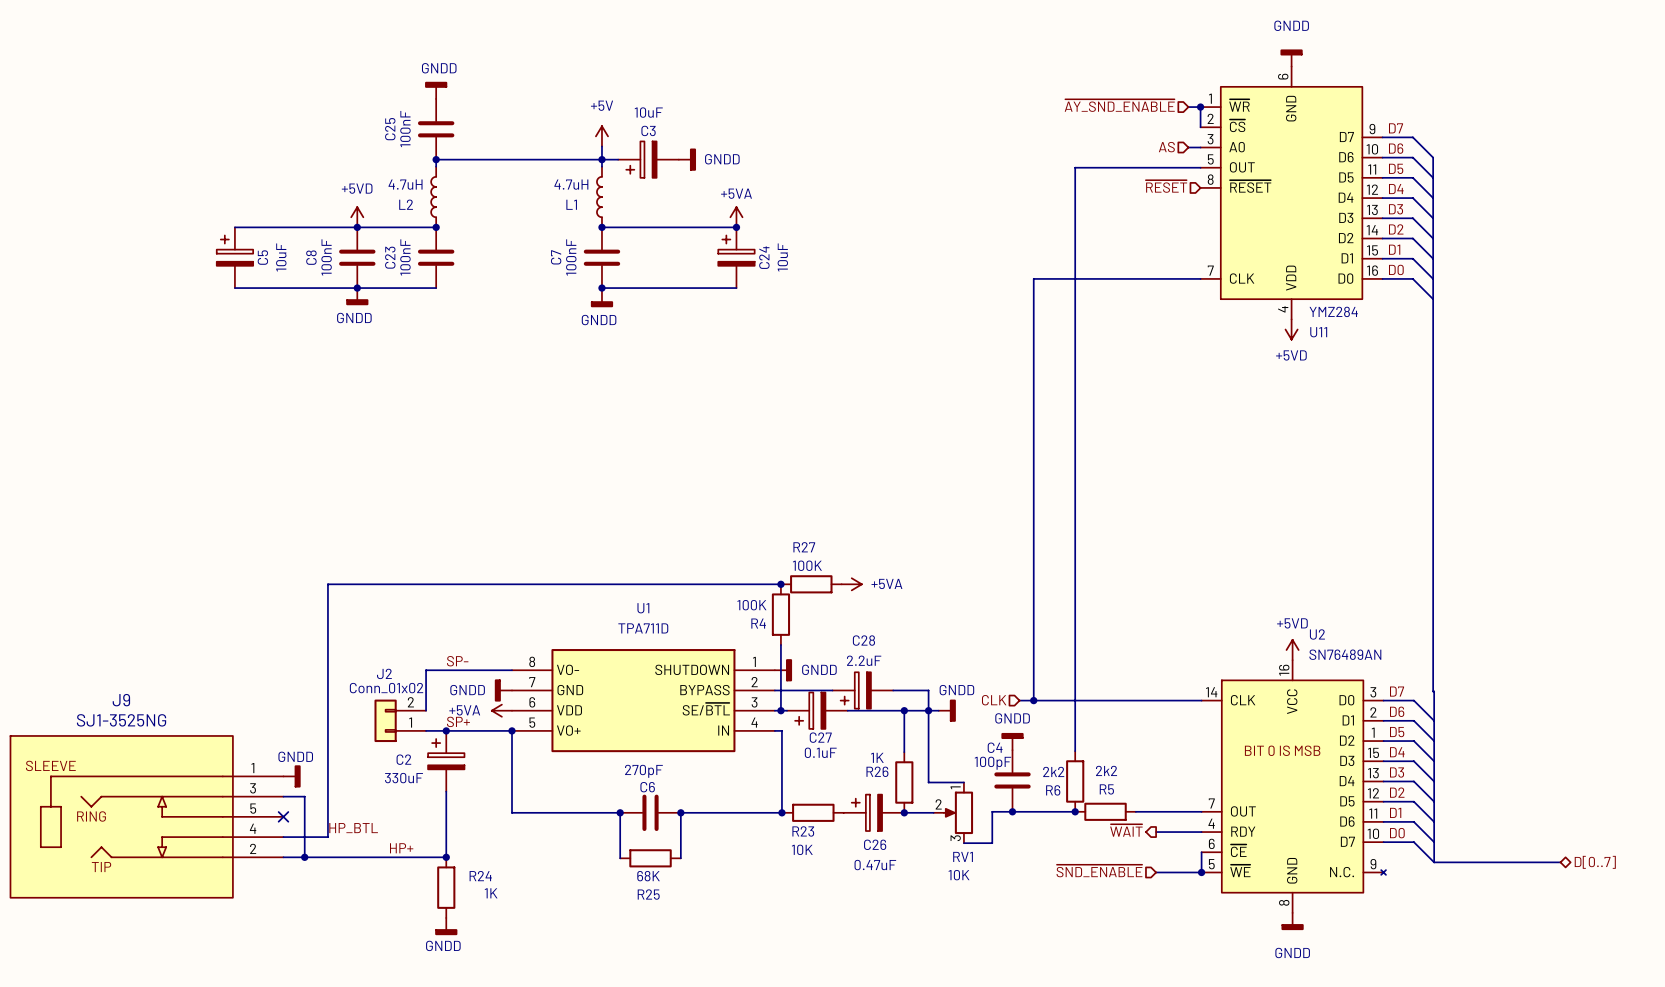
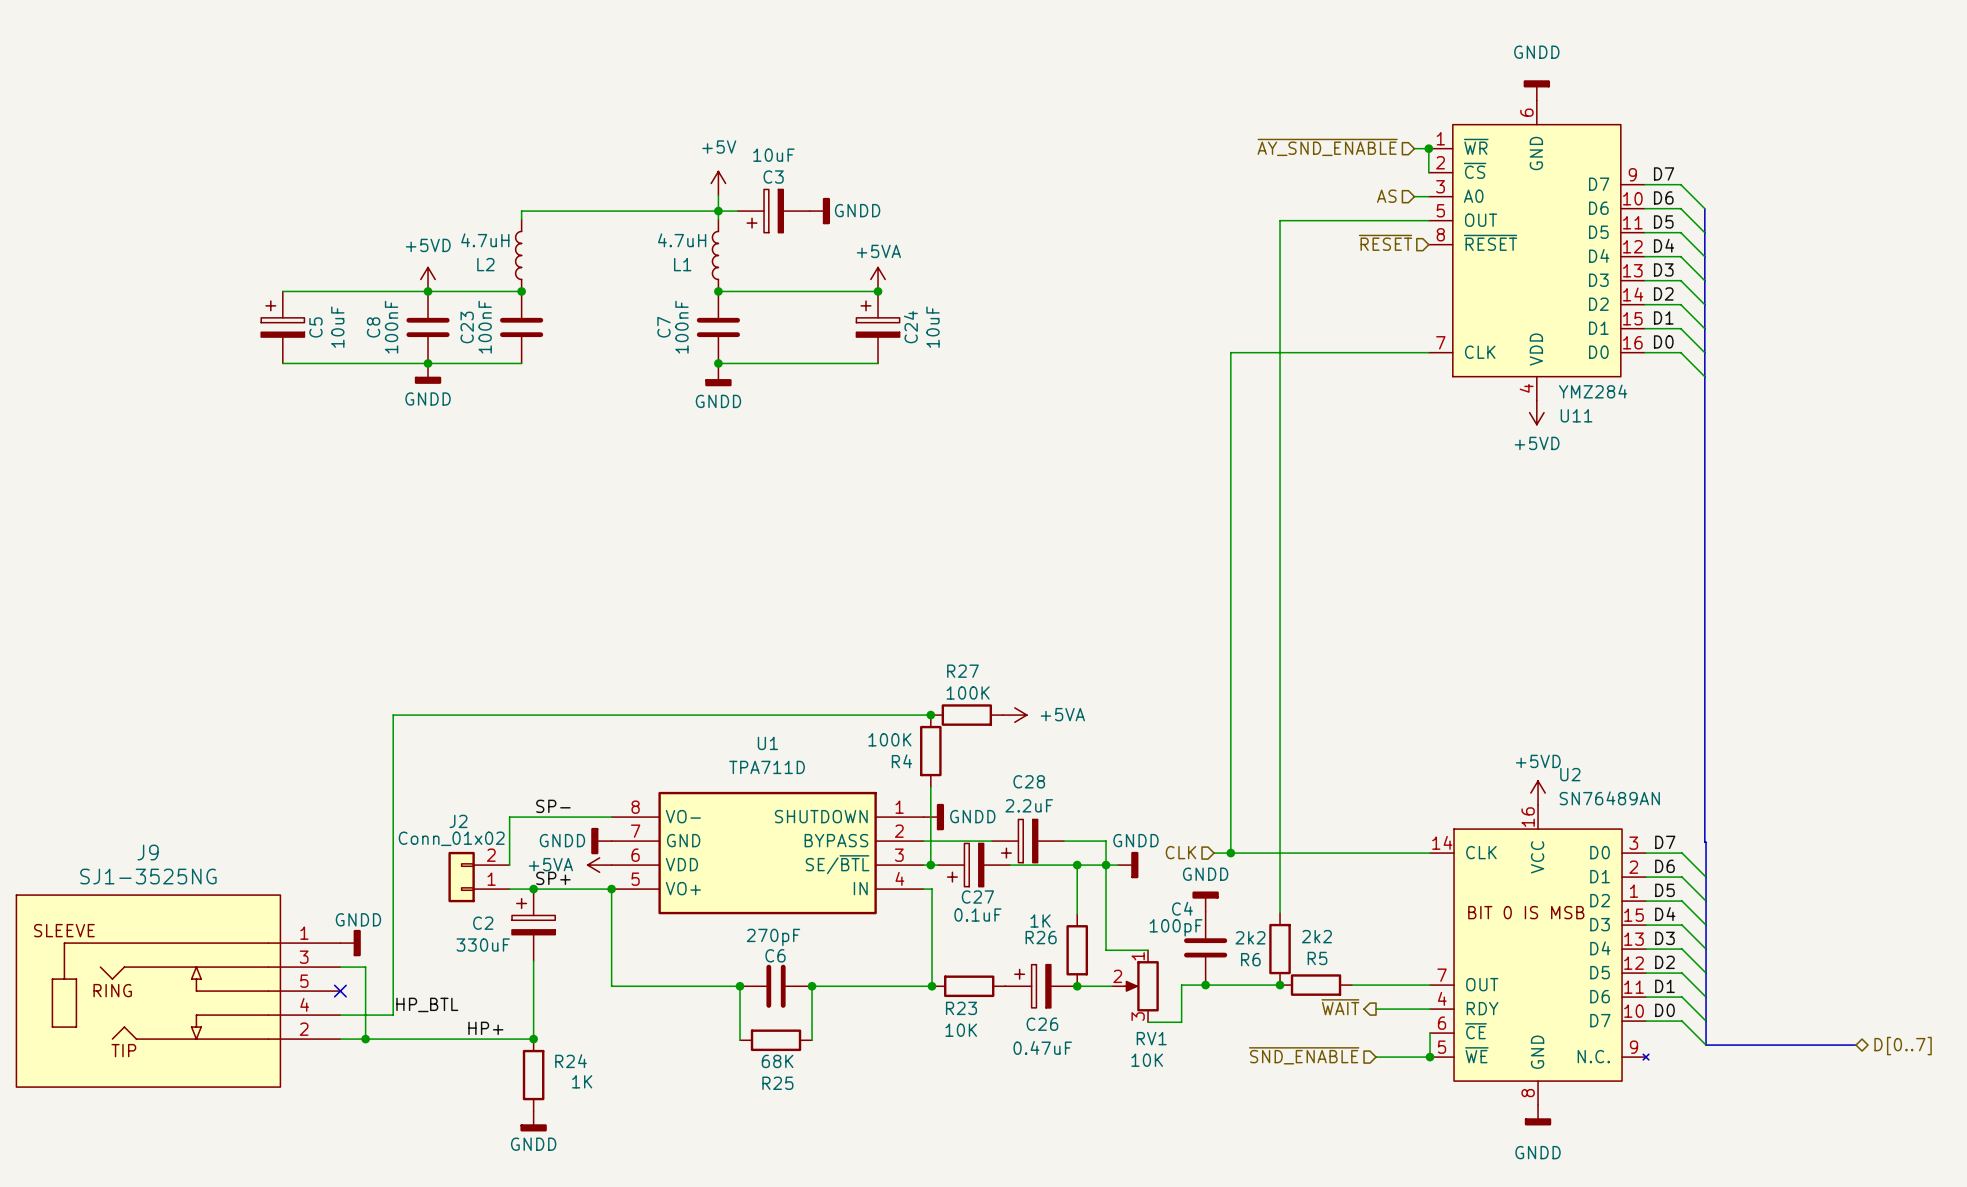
power symbol: GNDD (436, 90) -> none
C25: 100nF (436, 129) -> none
junction: (436, 159) -> none

